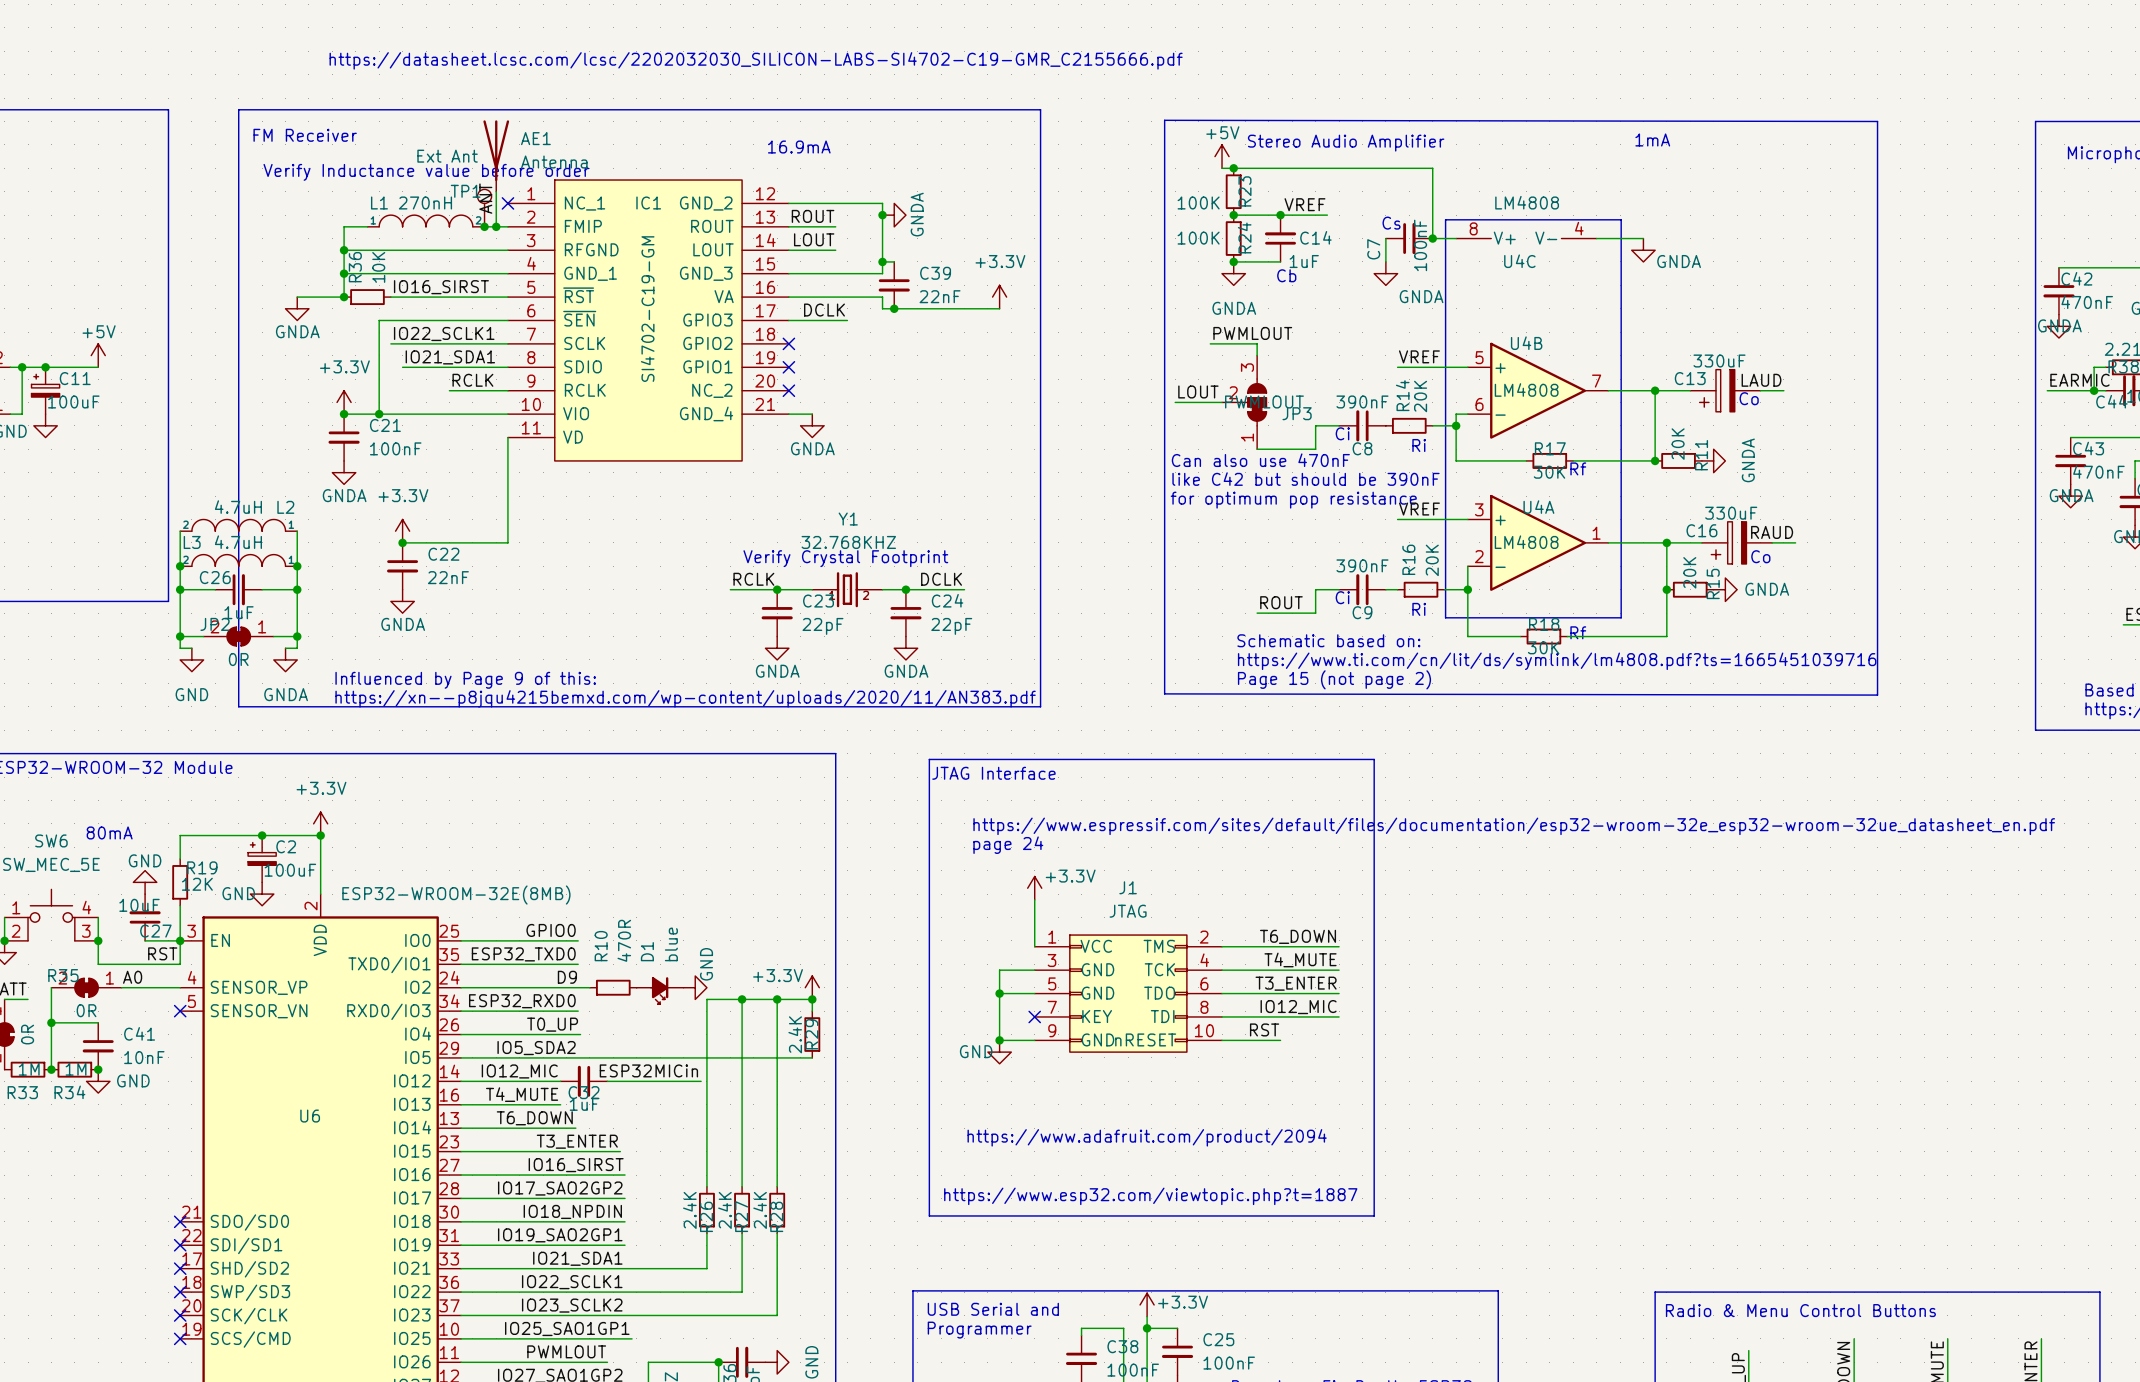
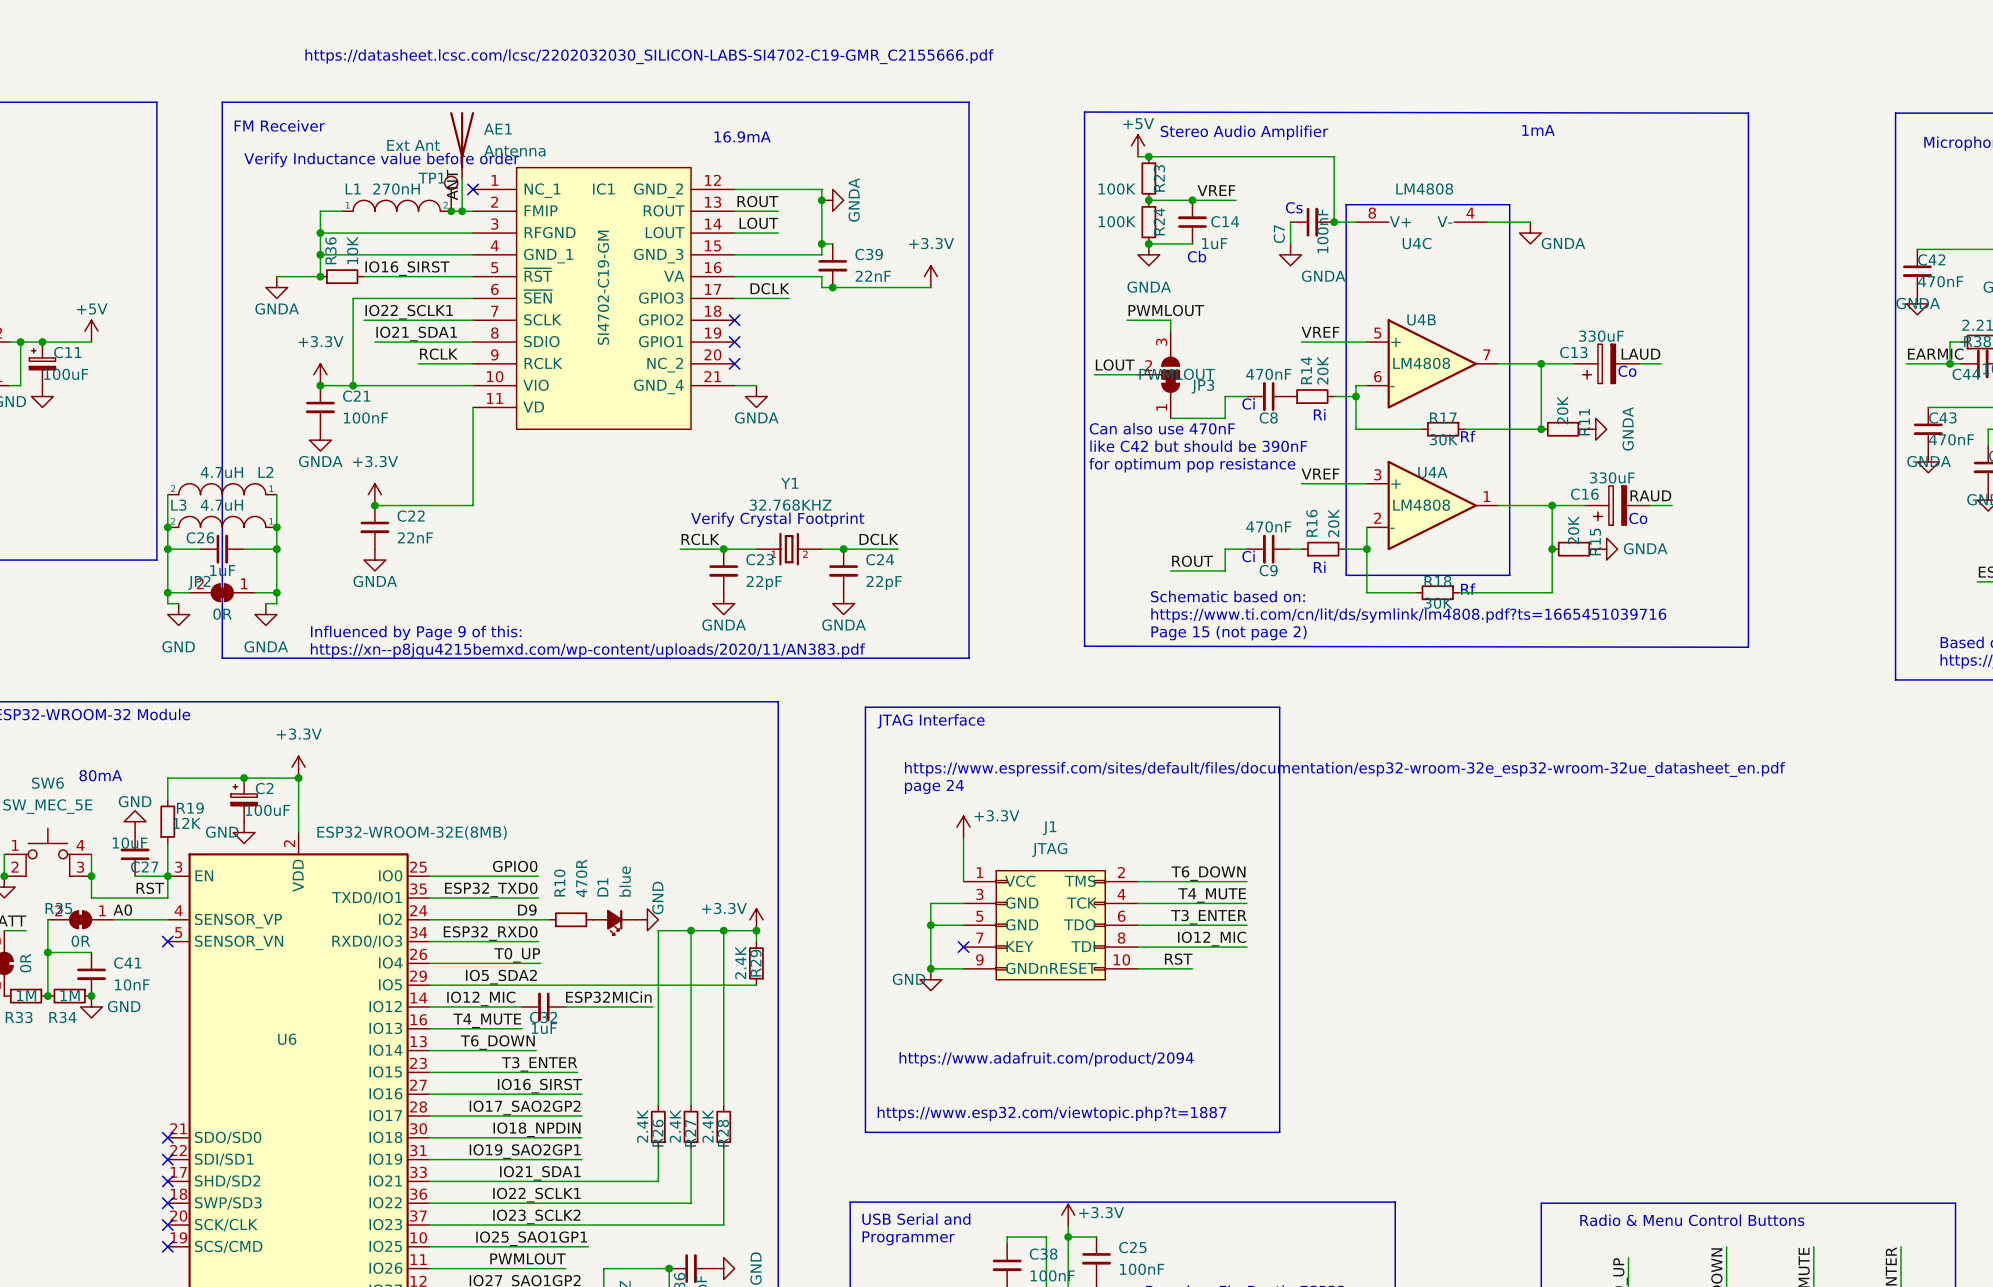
C8 value: 390nF (1362, 401) -> 470nF (1268, 374)
C9 value: 390nF (1362, 565) -> 470nF (1268, 526)

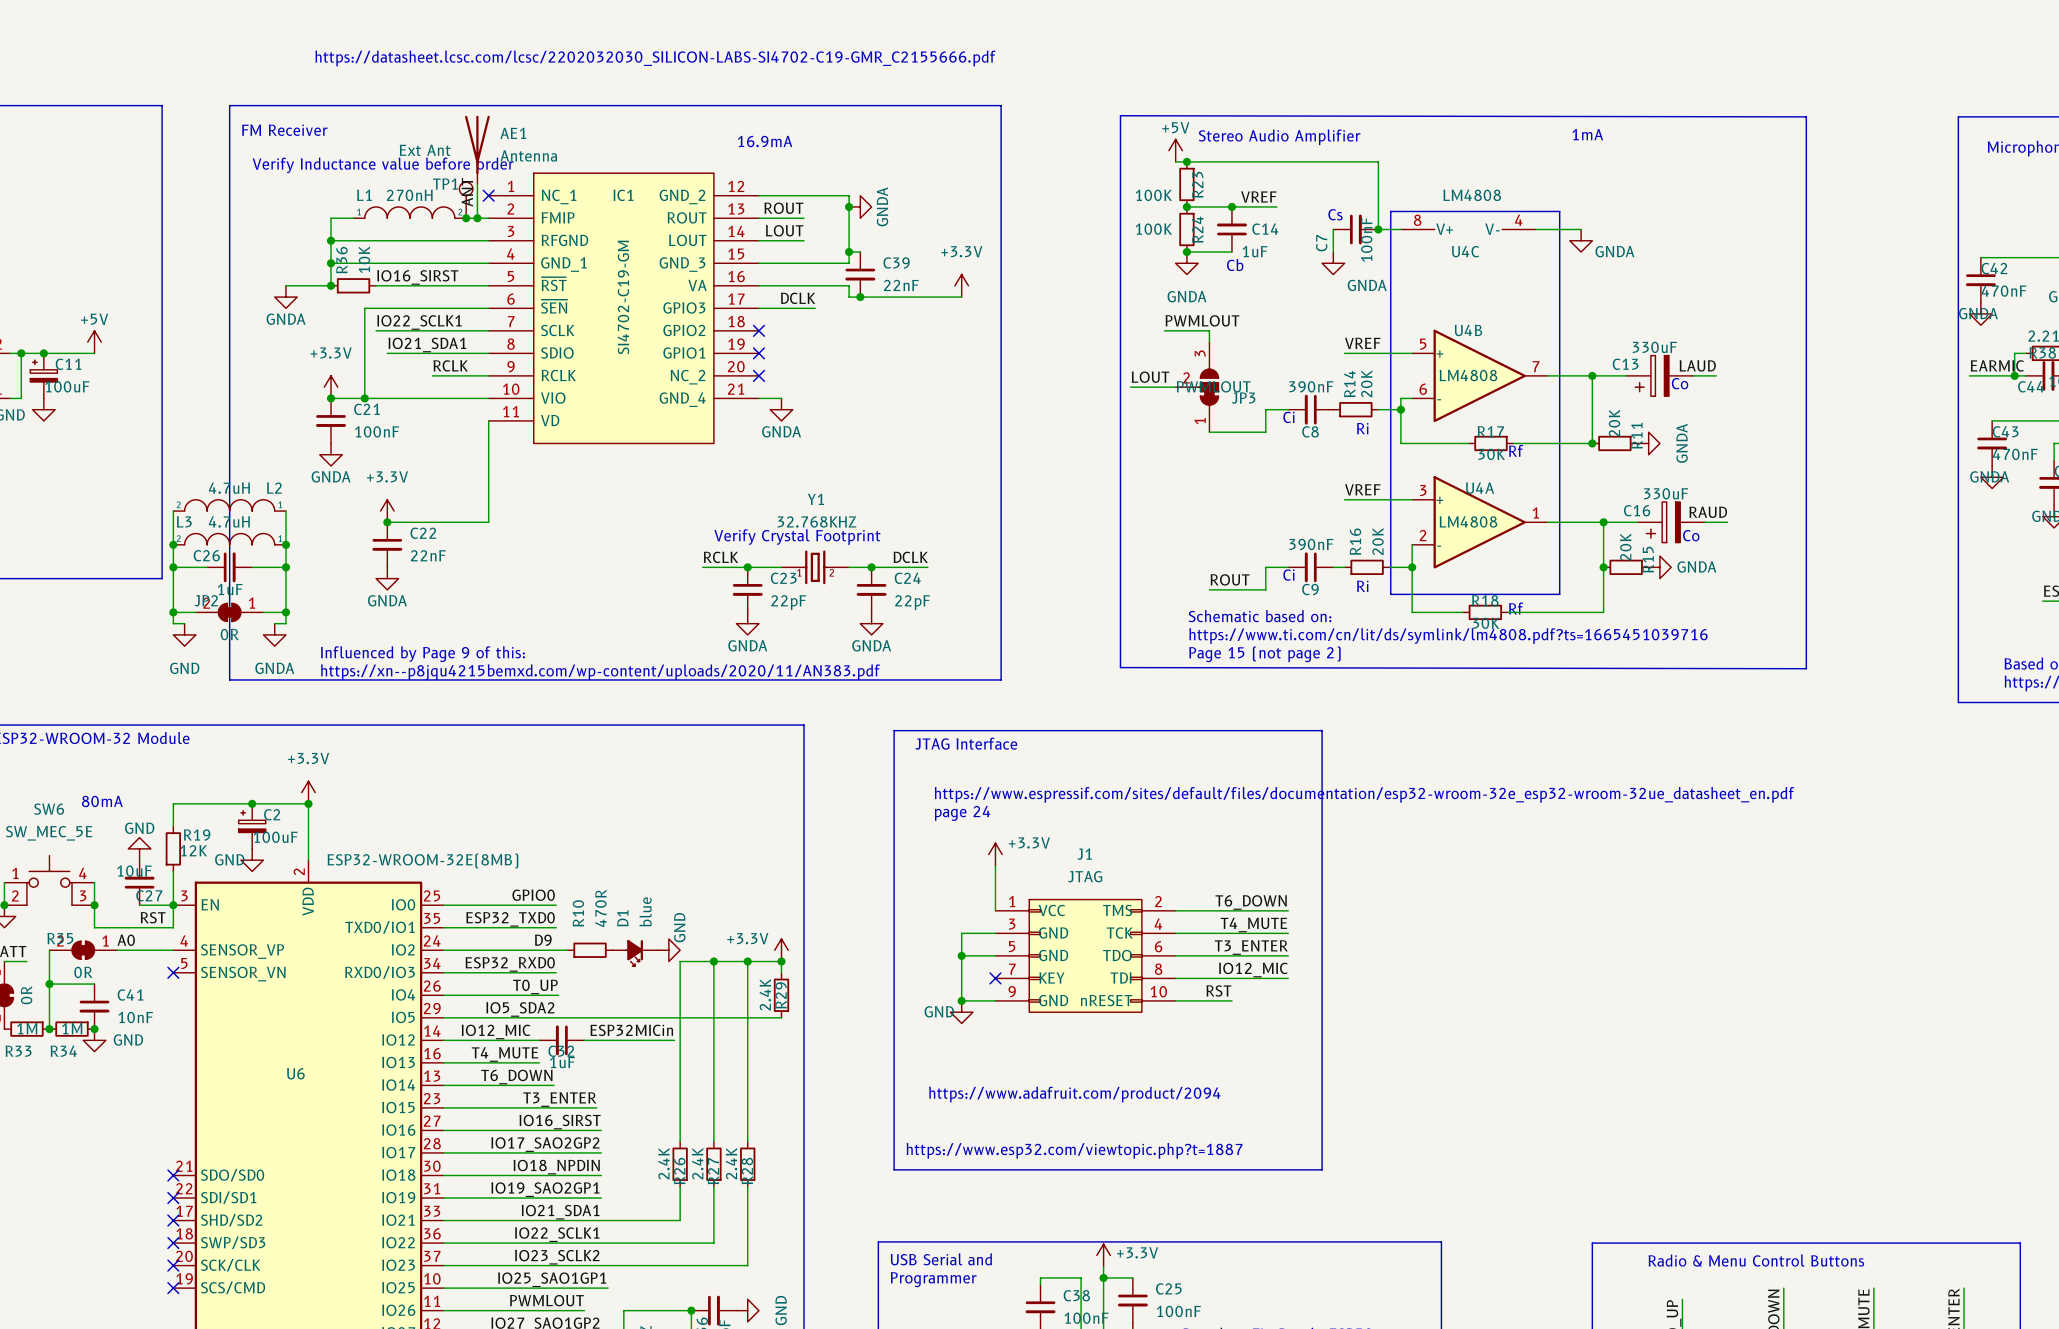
C8 value: 470nF (1268, 374) -> 390nF (1311, 386)
text: Can also use 470nF (1162, 428) -> none
text: like C42 but should be 390nF (1198, 446) -> none
text: for optimum pop resistance (1192, 465) -> none
C9 value: 470nF (1268, 526) -> 390nF (1311, 544)

